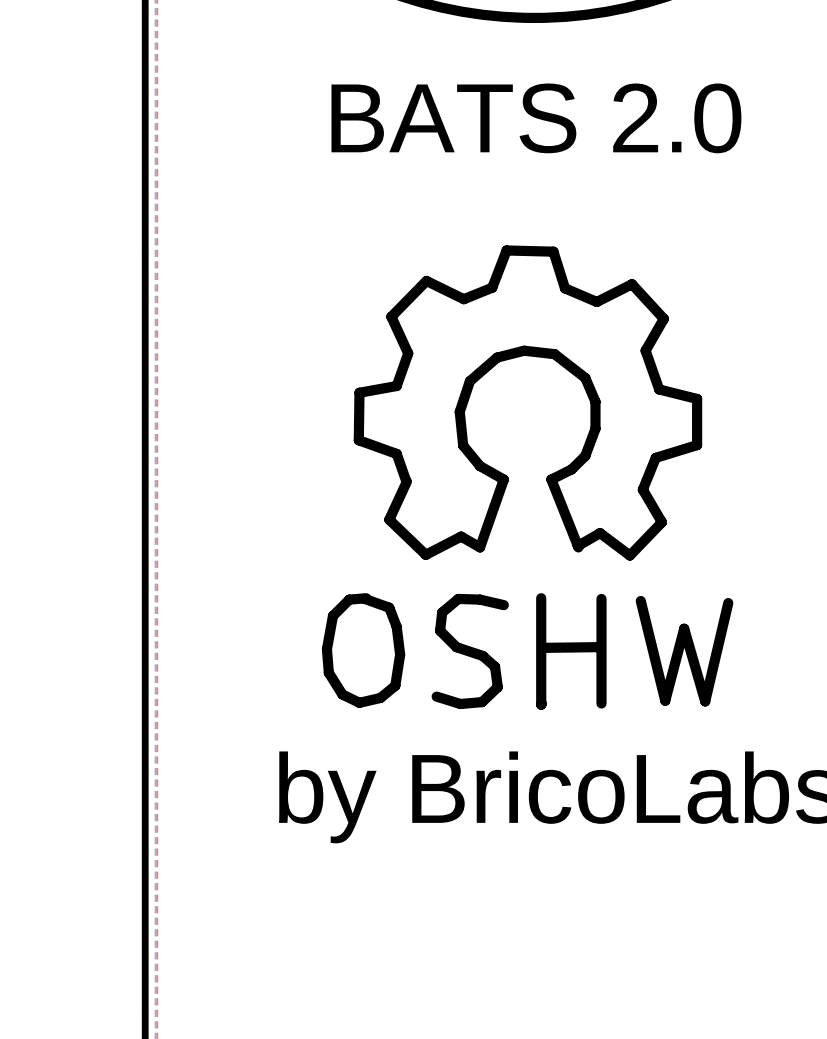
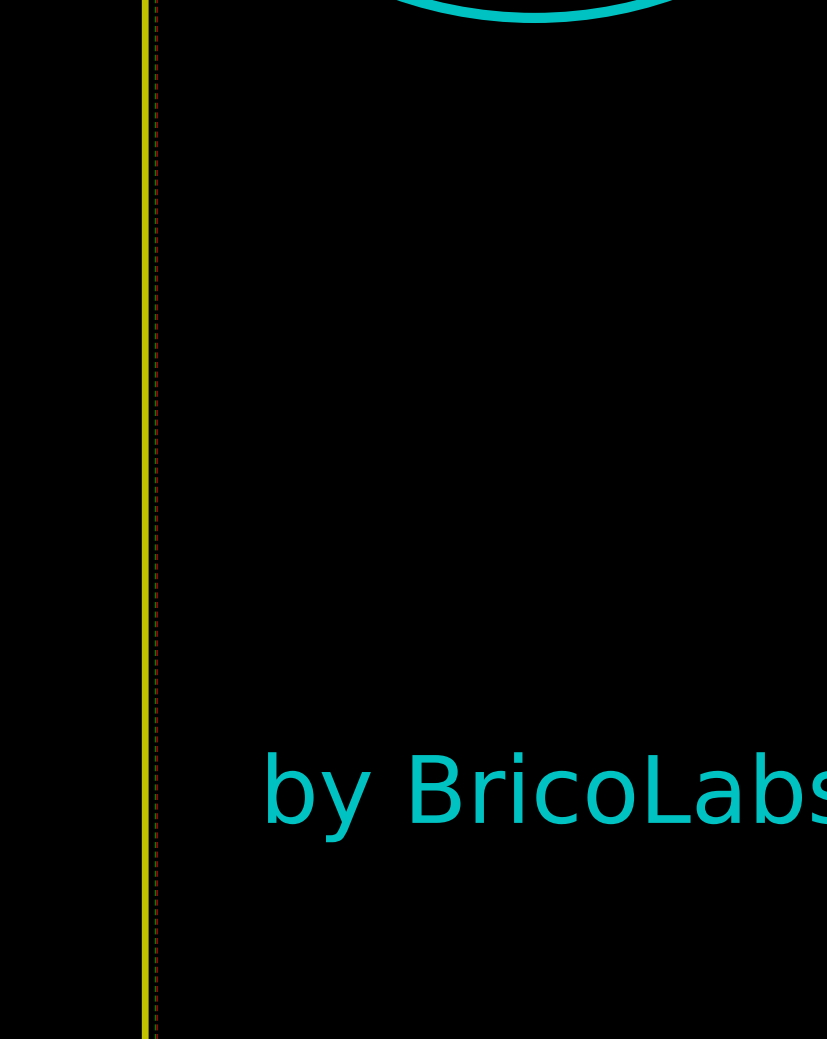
BATS 2.0: (527, 477) -> none

